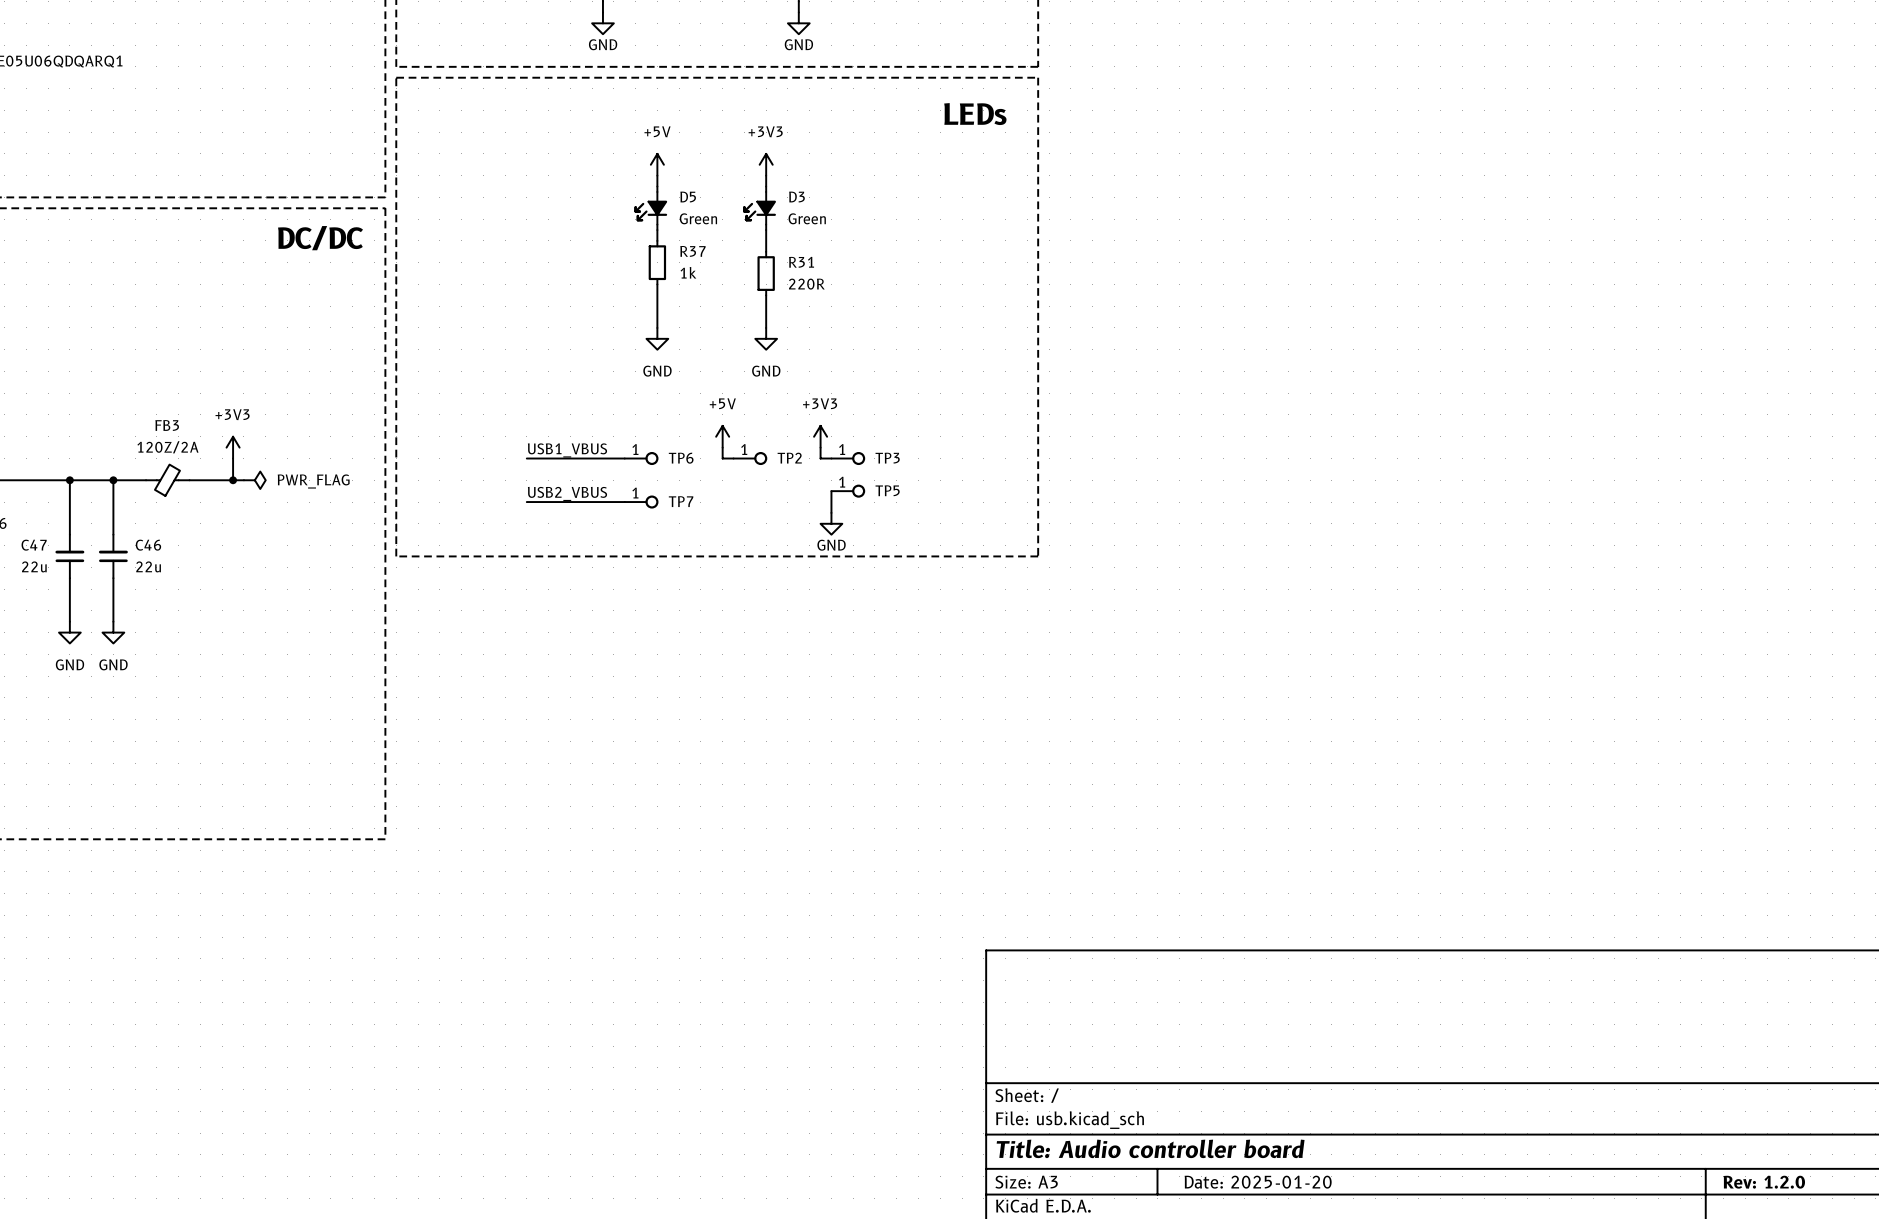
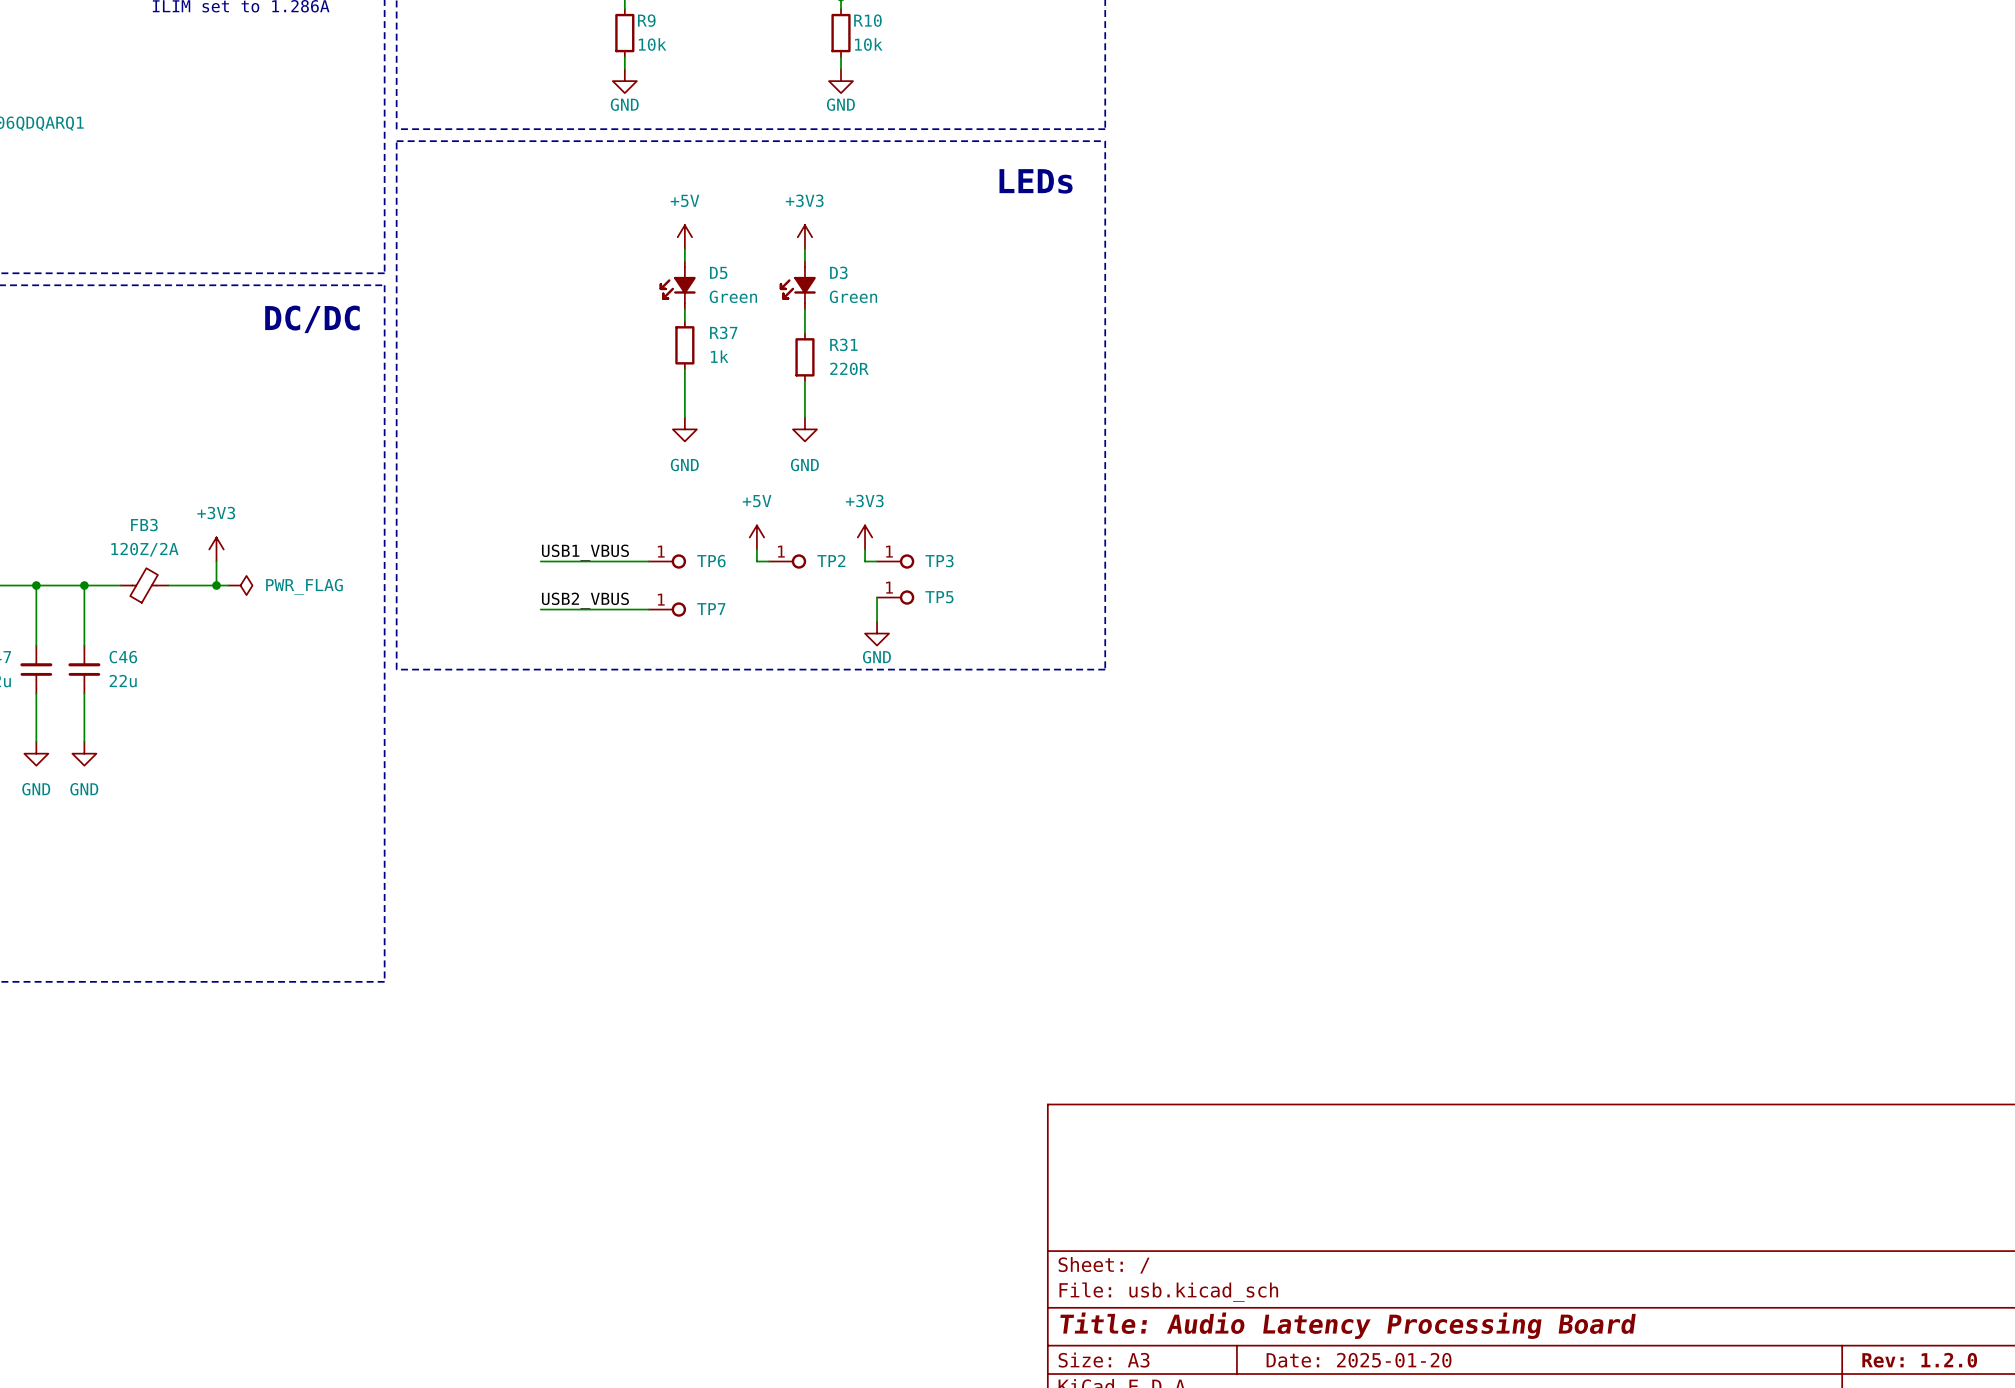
title block: Title: Audio controller board (1150, 1148) -> Title: Audio Latency Processing Board (1348, 1325)

